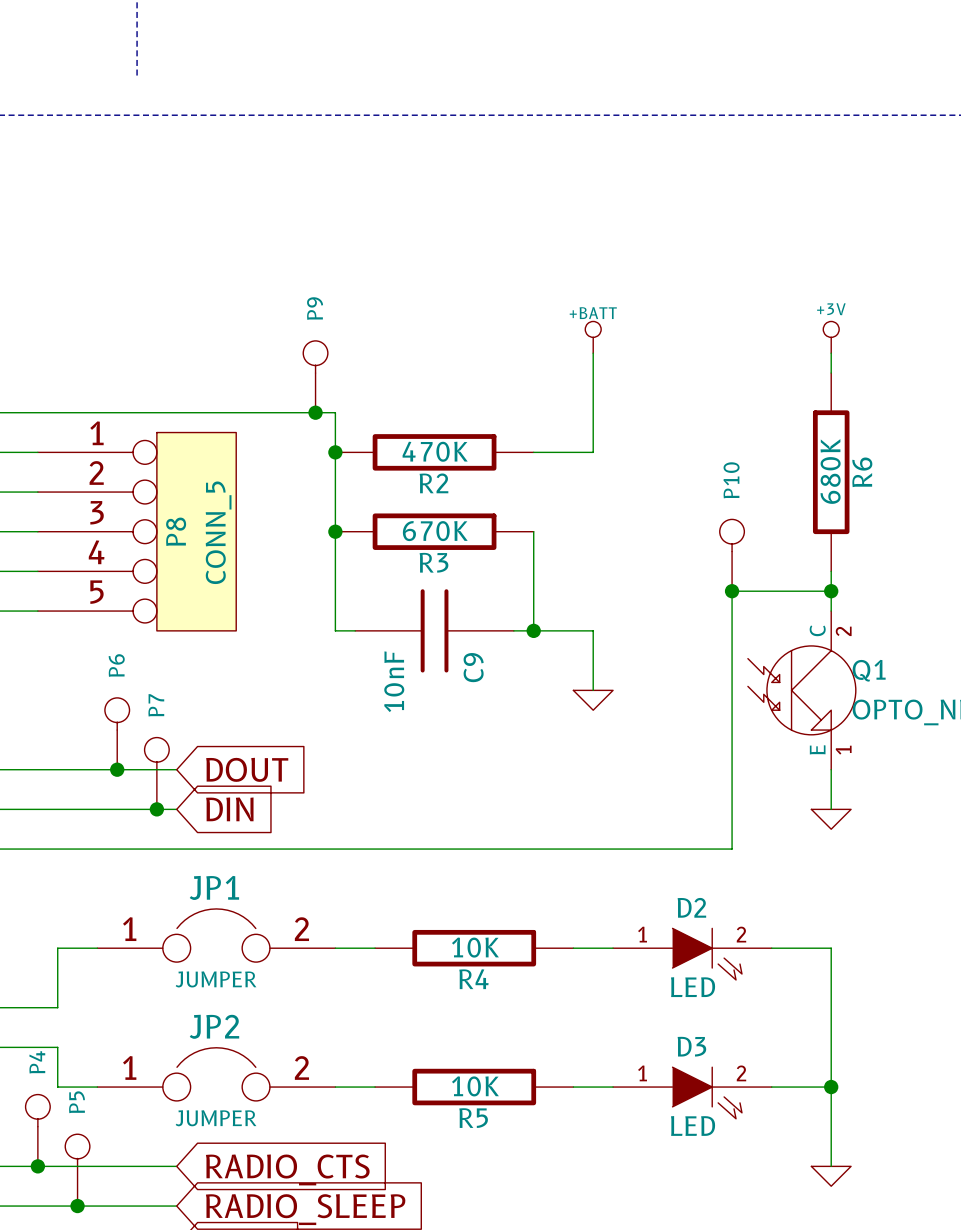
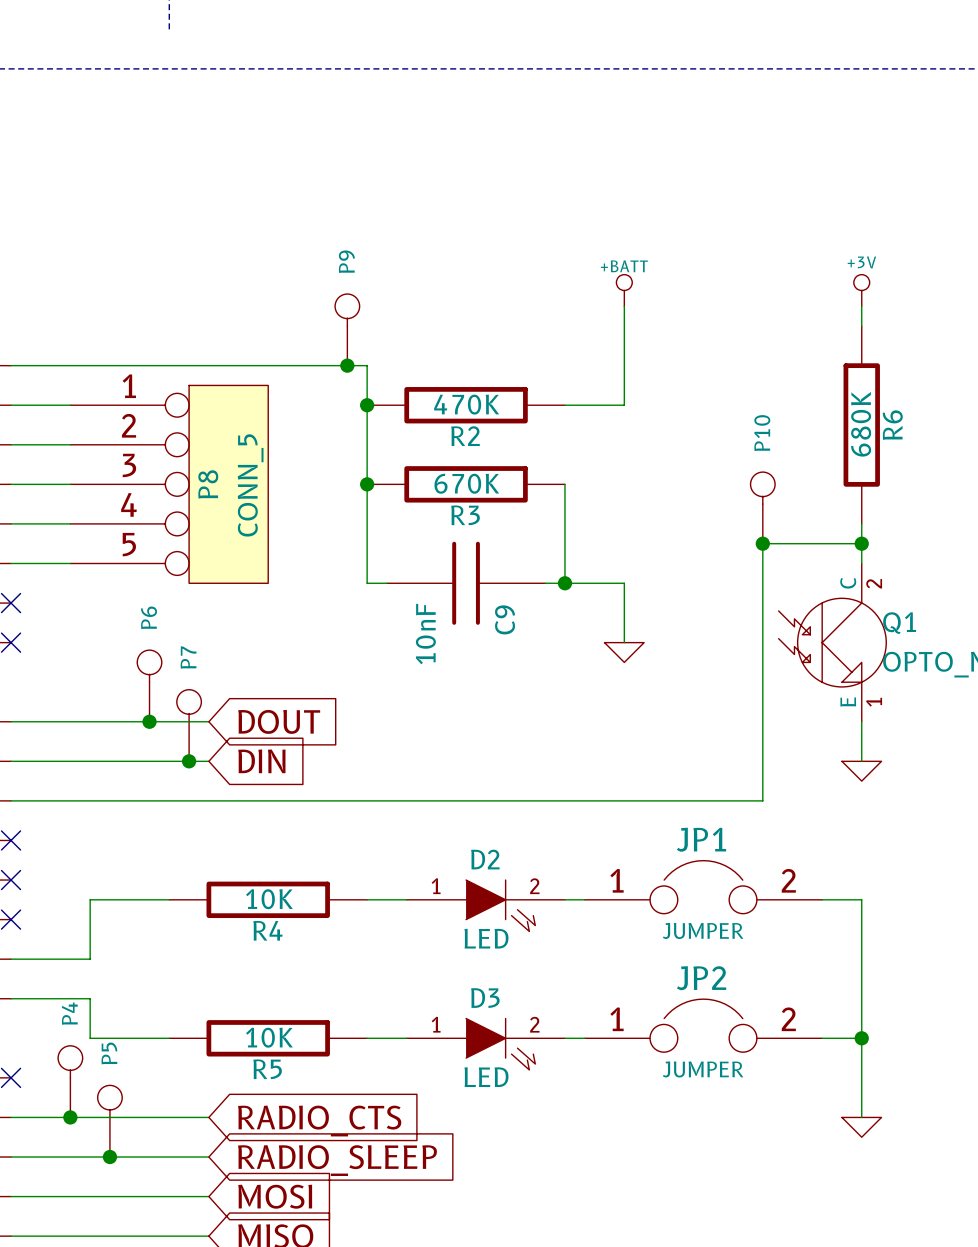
JP1 position: (216, 935) -> (703, 887)
R4 position: (474, 948) -> (268, 899)
D2 position: (692, 954) -> (485, 905)
JP2 position: (216, 1074) -> (703, 1025)
R5 position: (474, 1087) -> (268, 1038)
D3 position: (692, 1092) -> (485, 1044)

